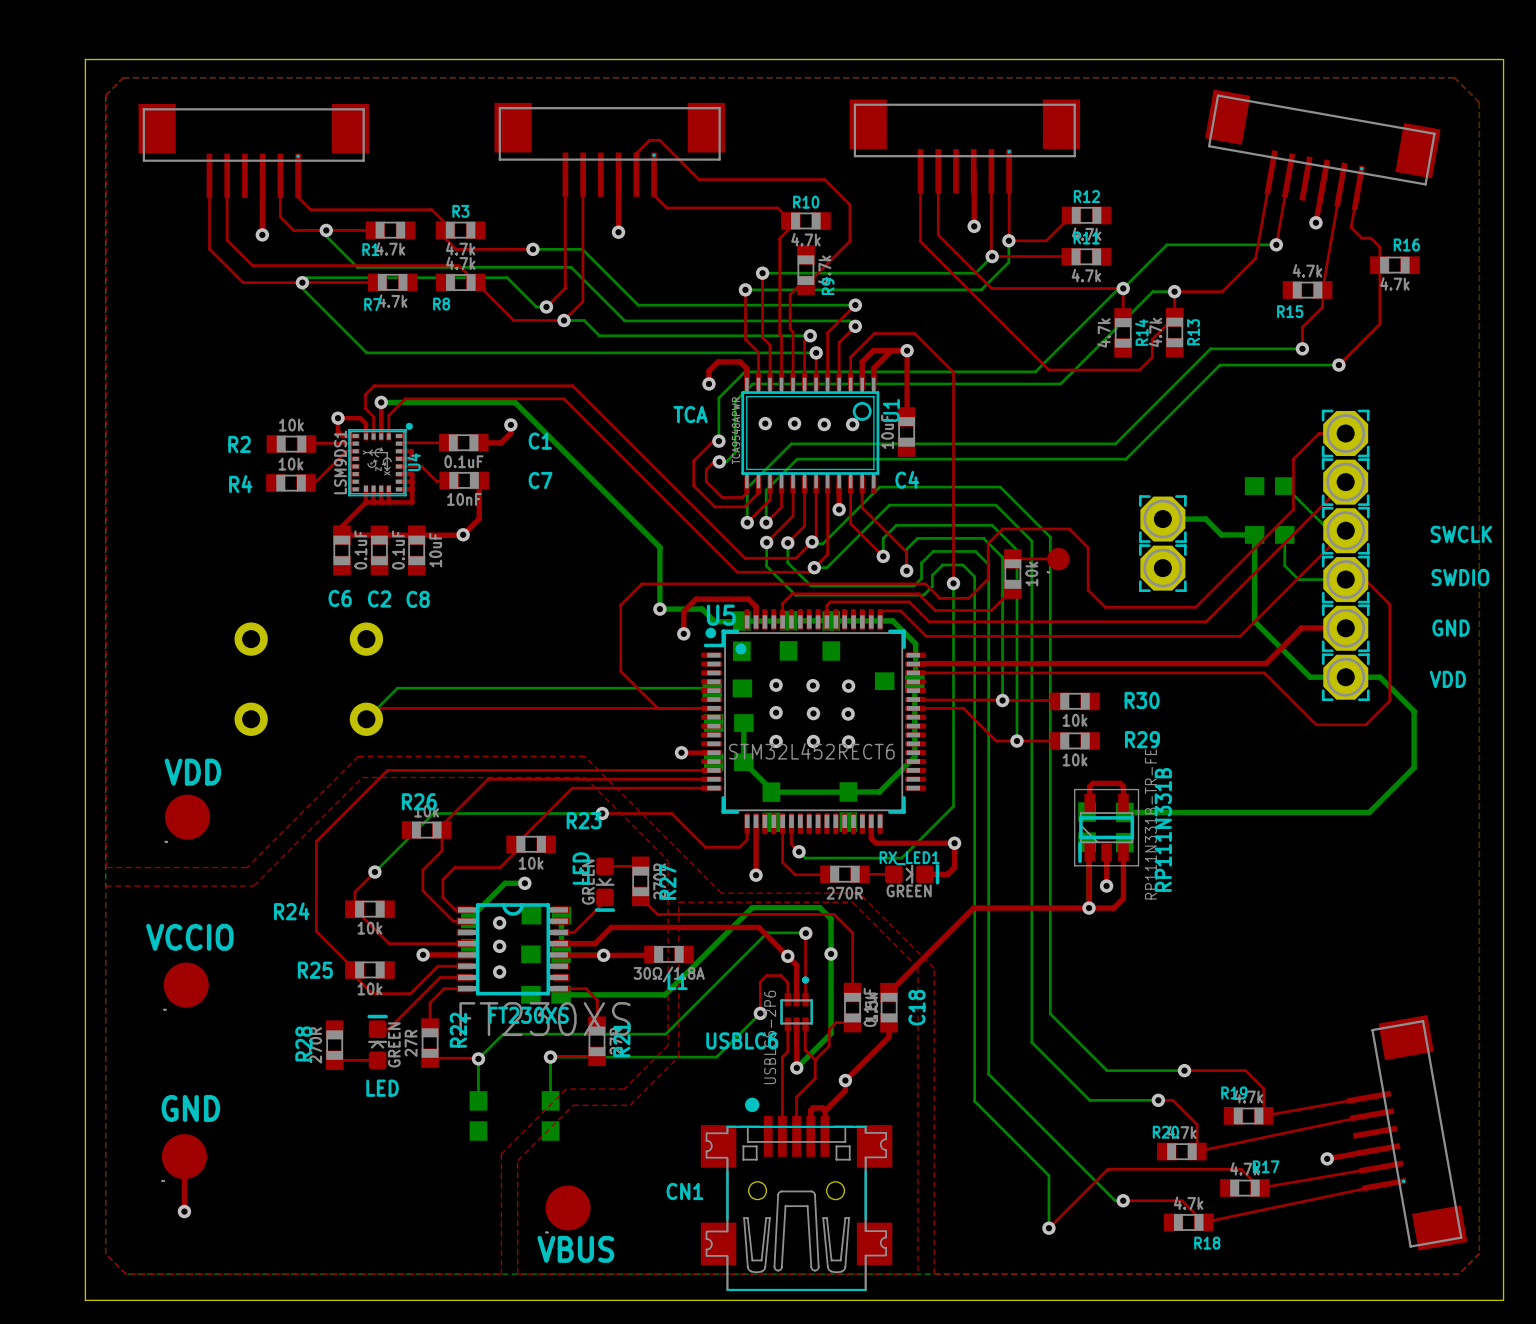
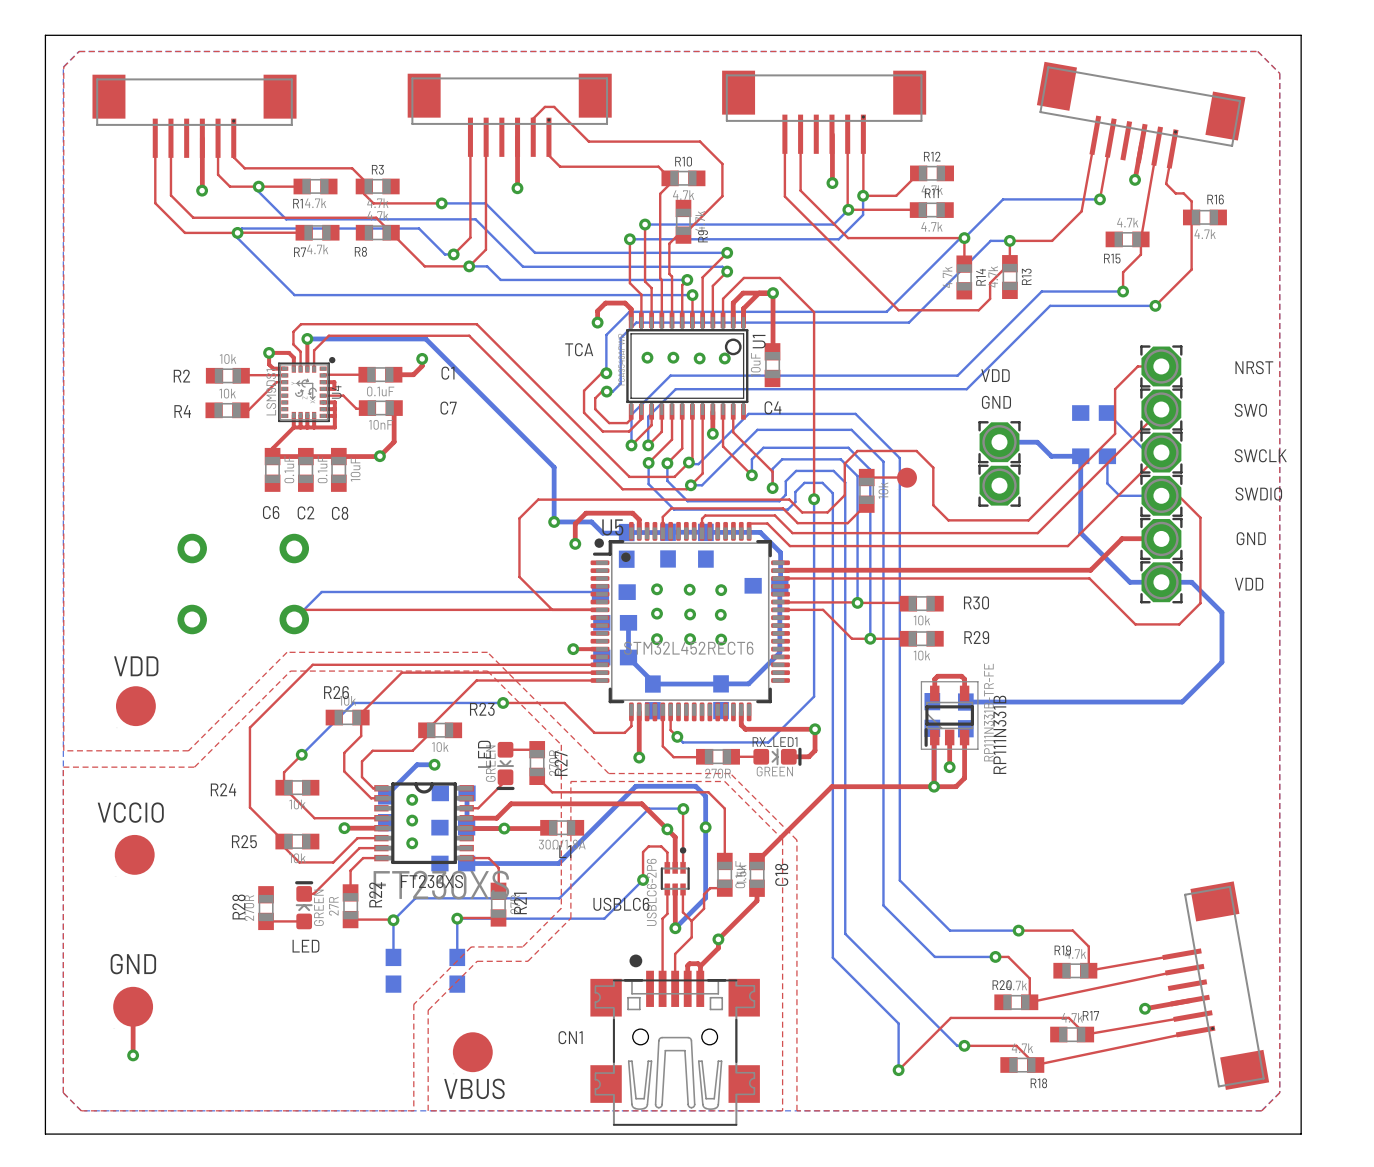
text: none -> NRST (1254, 367)
text: none -> VDD (995, 375)
text: none -> GND (996, 402)
text: none -> SWO (1250, 410)

